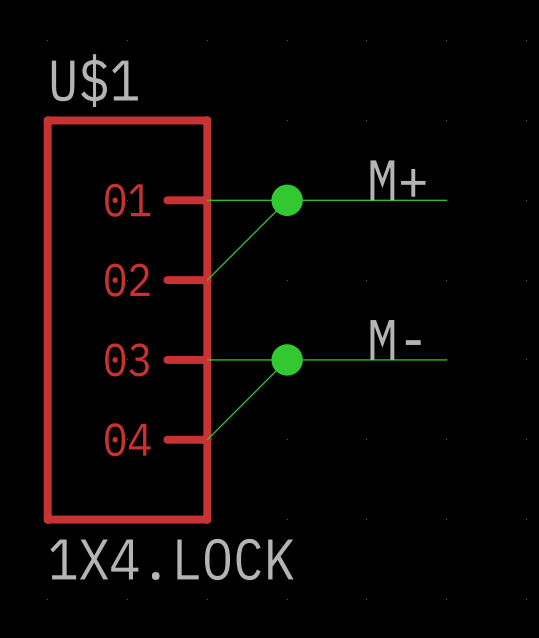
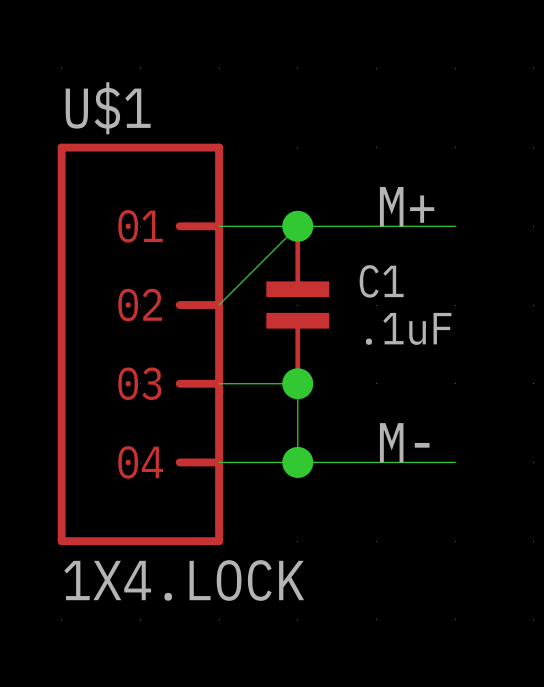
C1: none -> .1uF (297, 305)
label position: M- (395, 339) -> M- (404, 442)
wire: none -> (297, 383) (297, 462)
wire: (446, 359) (287, 359) (207, 439) -> (455, 462) (219, 462)
junction: none -> (297, 462)

